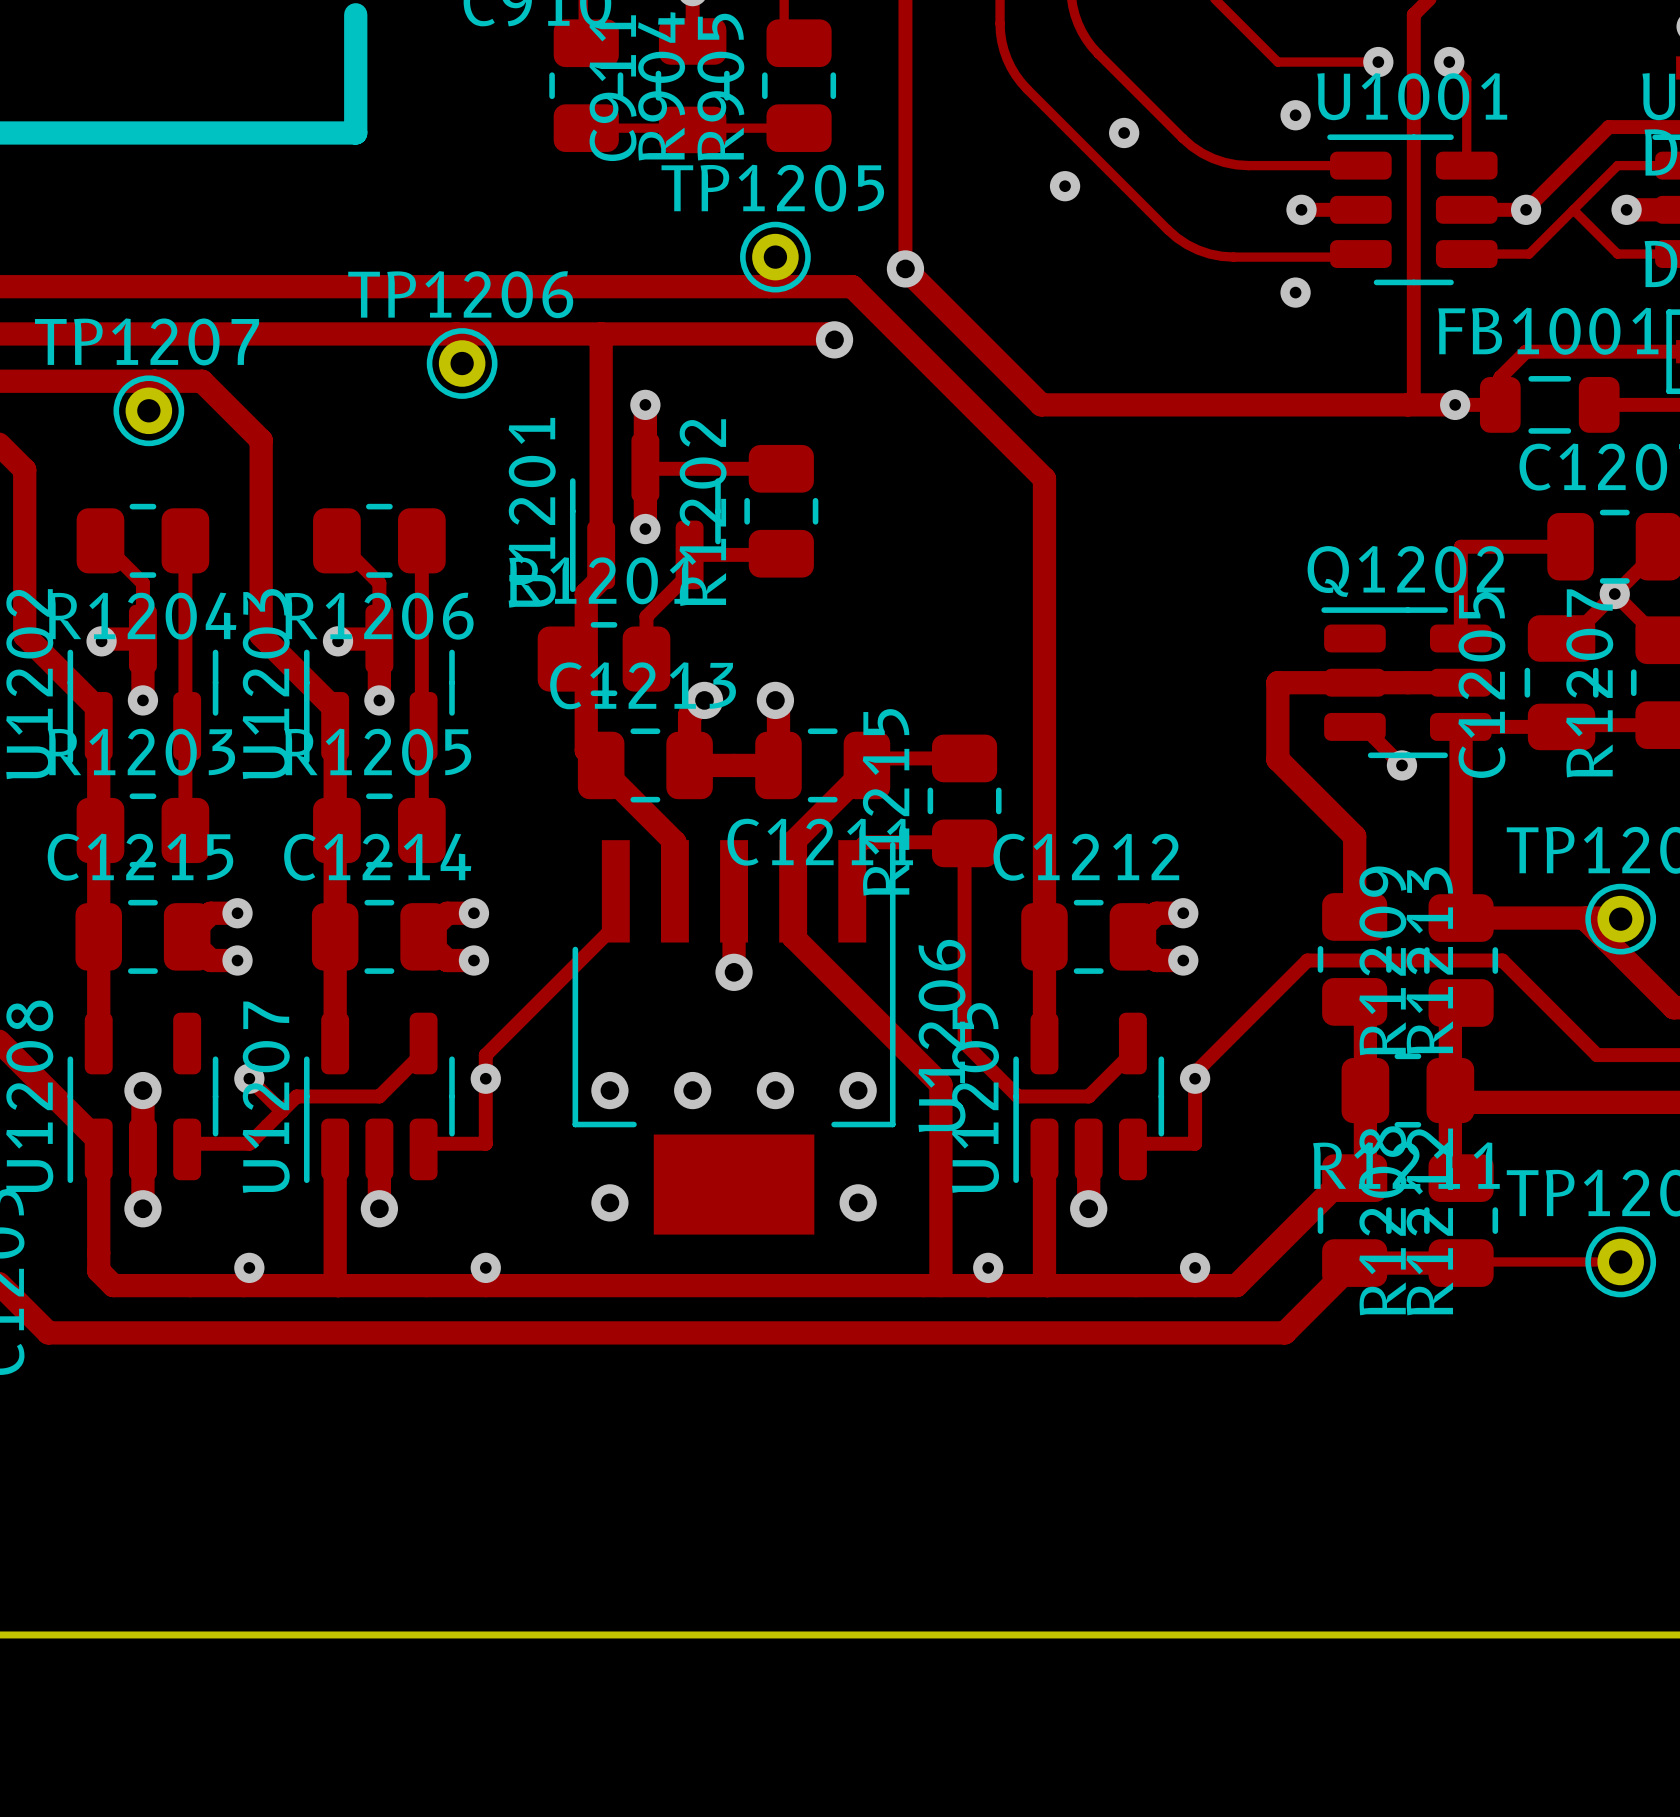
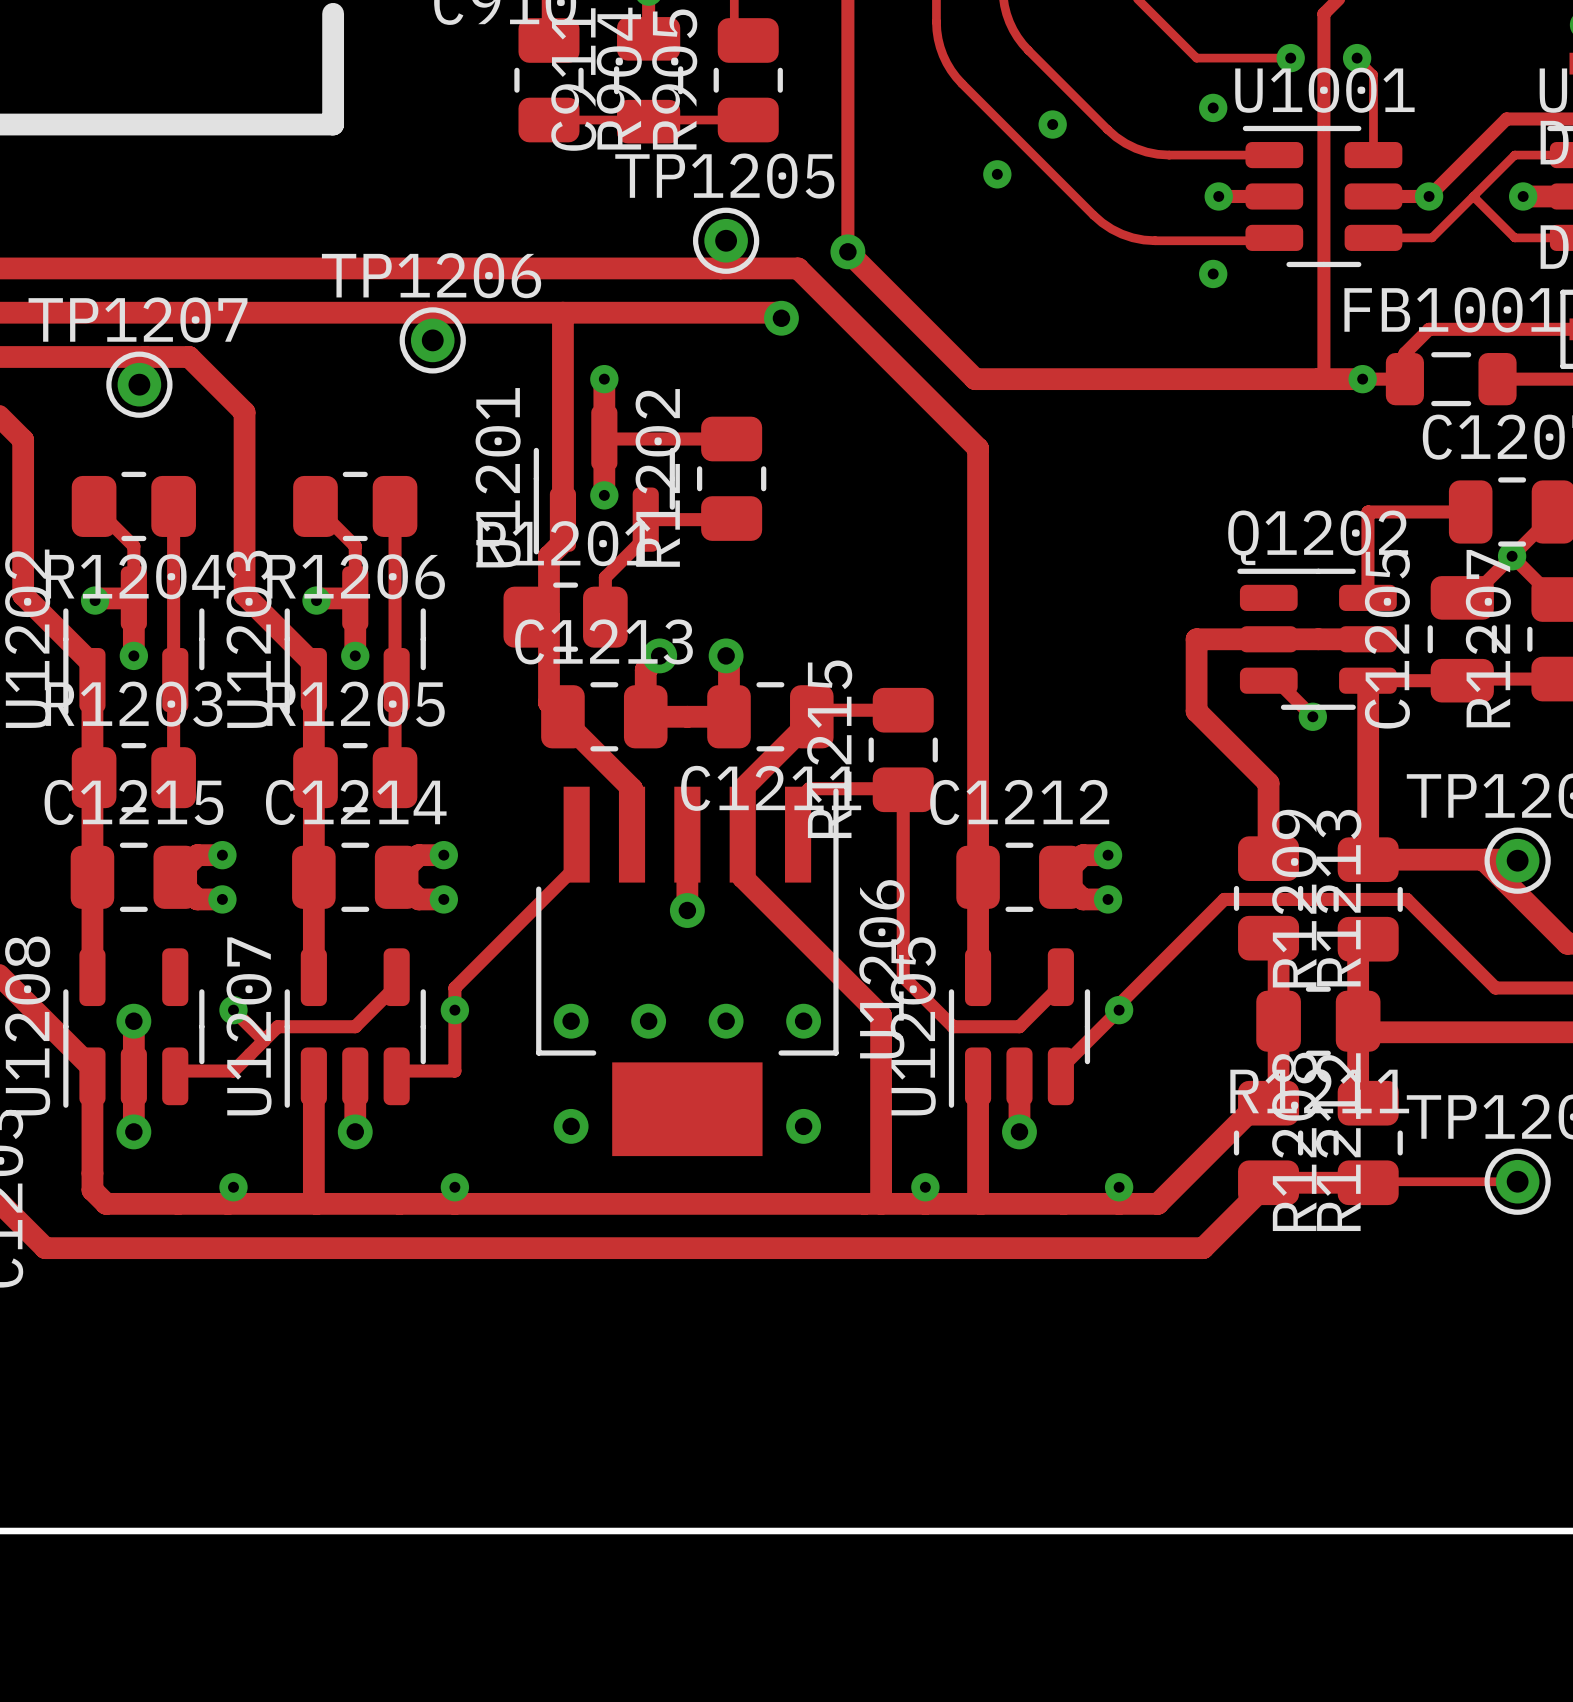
track: (1195, 1078) (1195, 1143) (1138, 1143) (1132, 1149) -> (1119, 1010) (1060, 1068)

